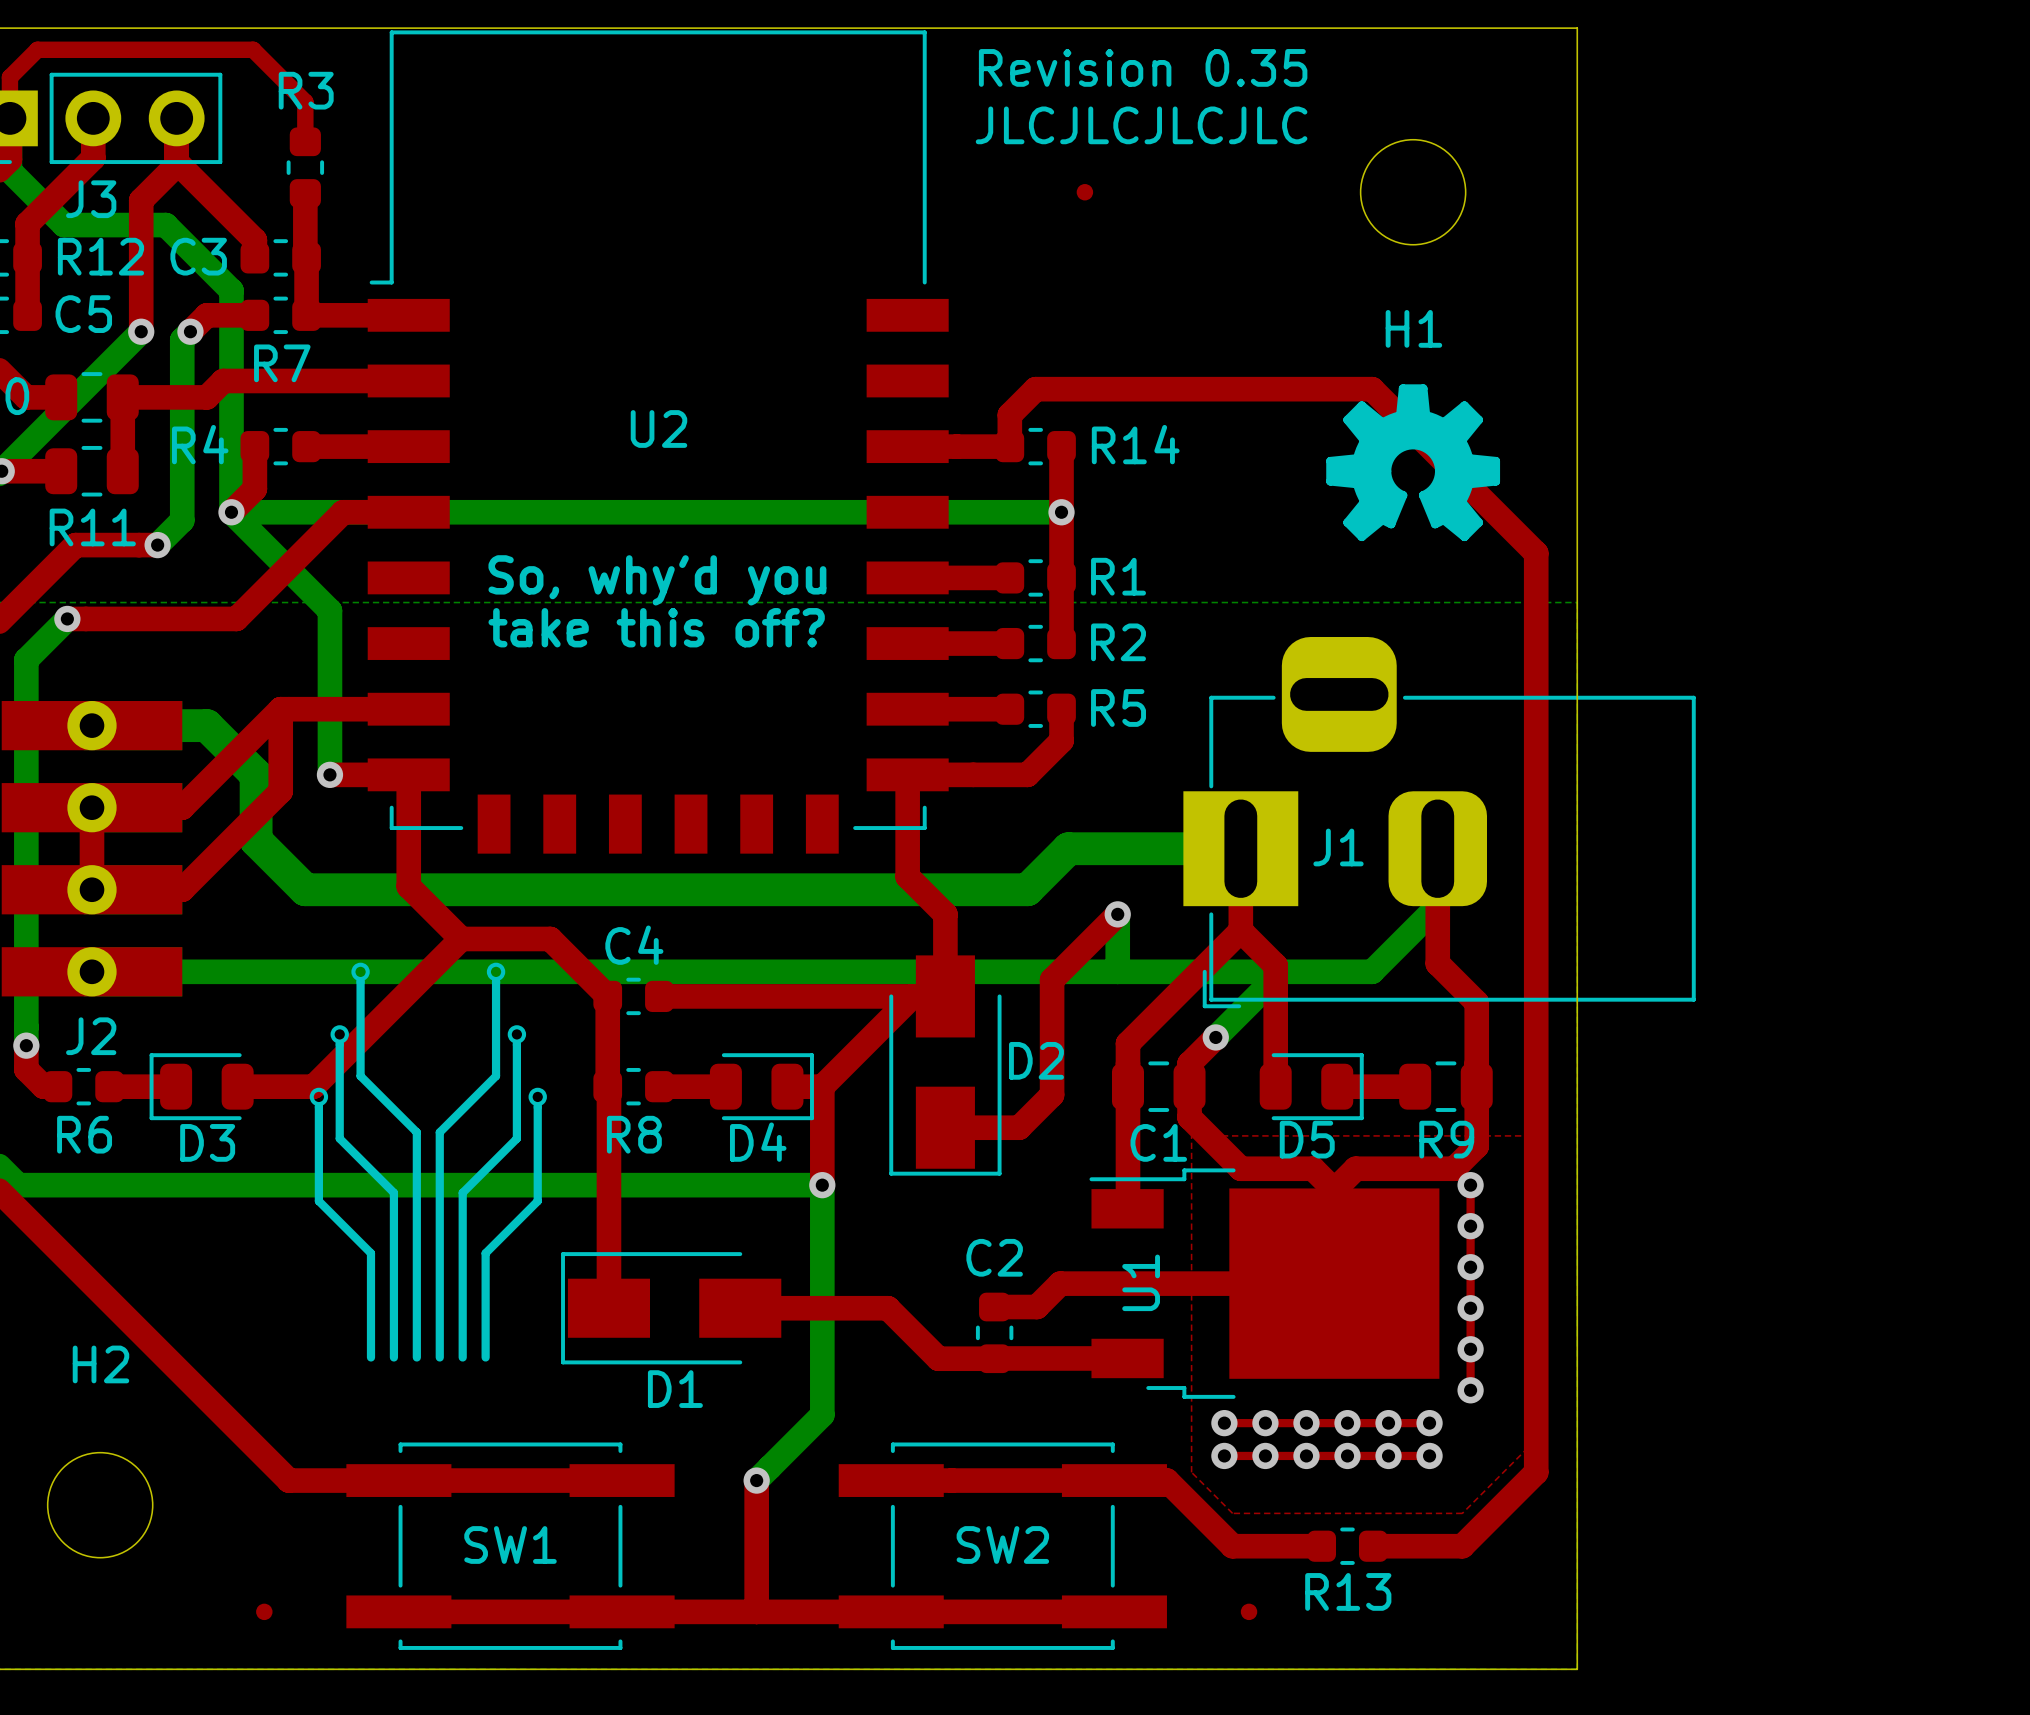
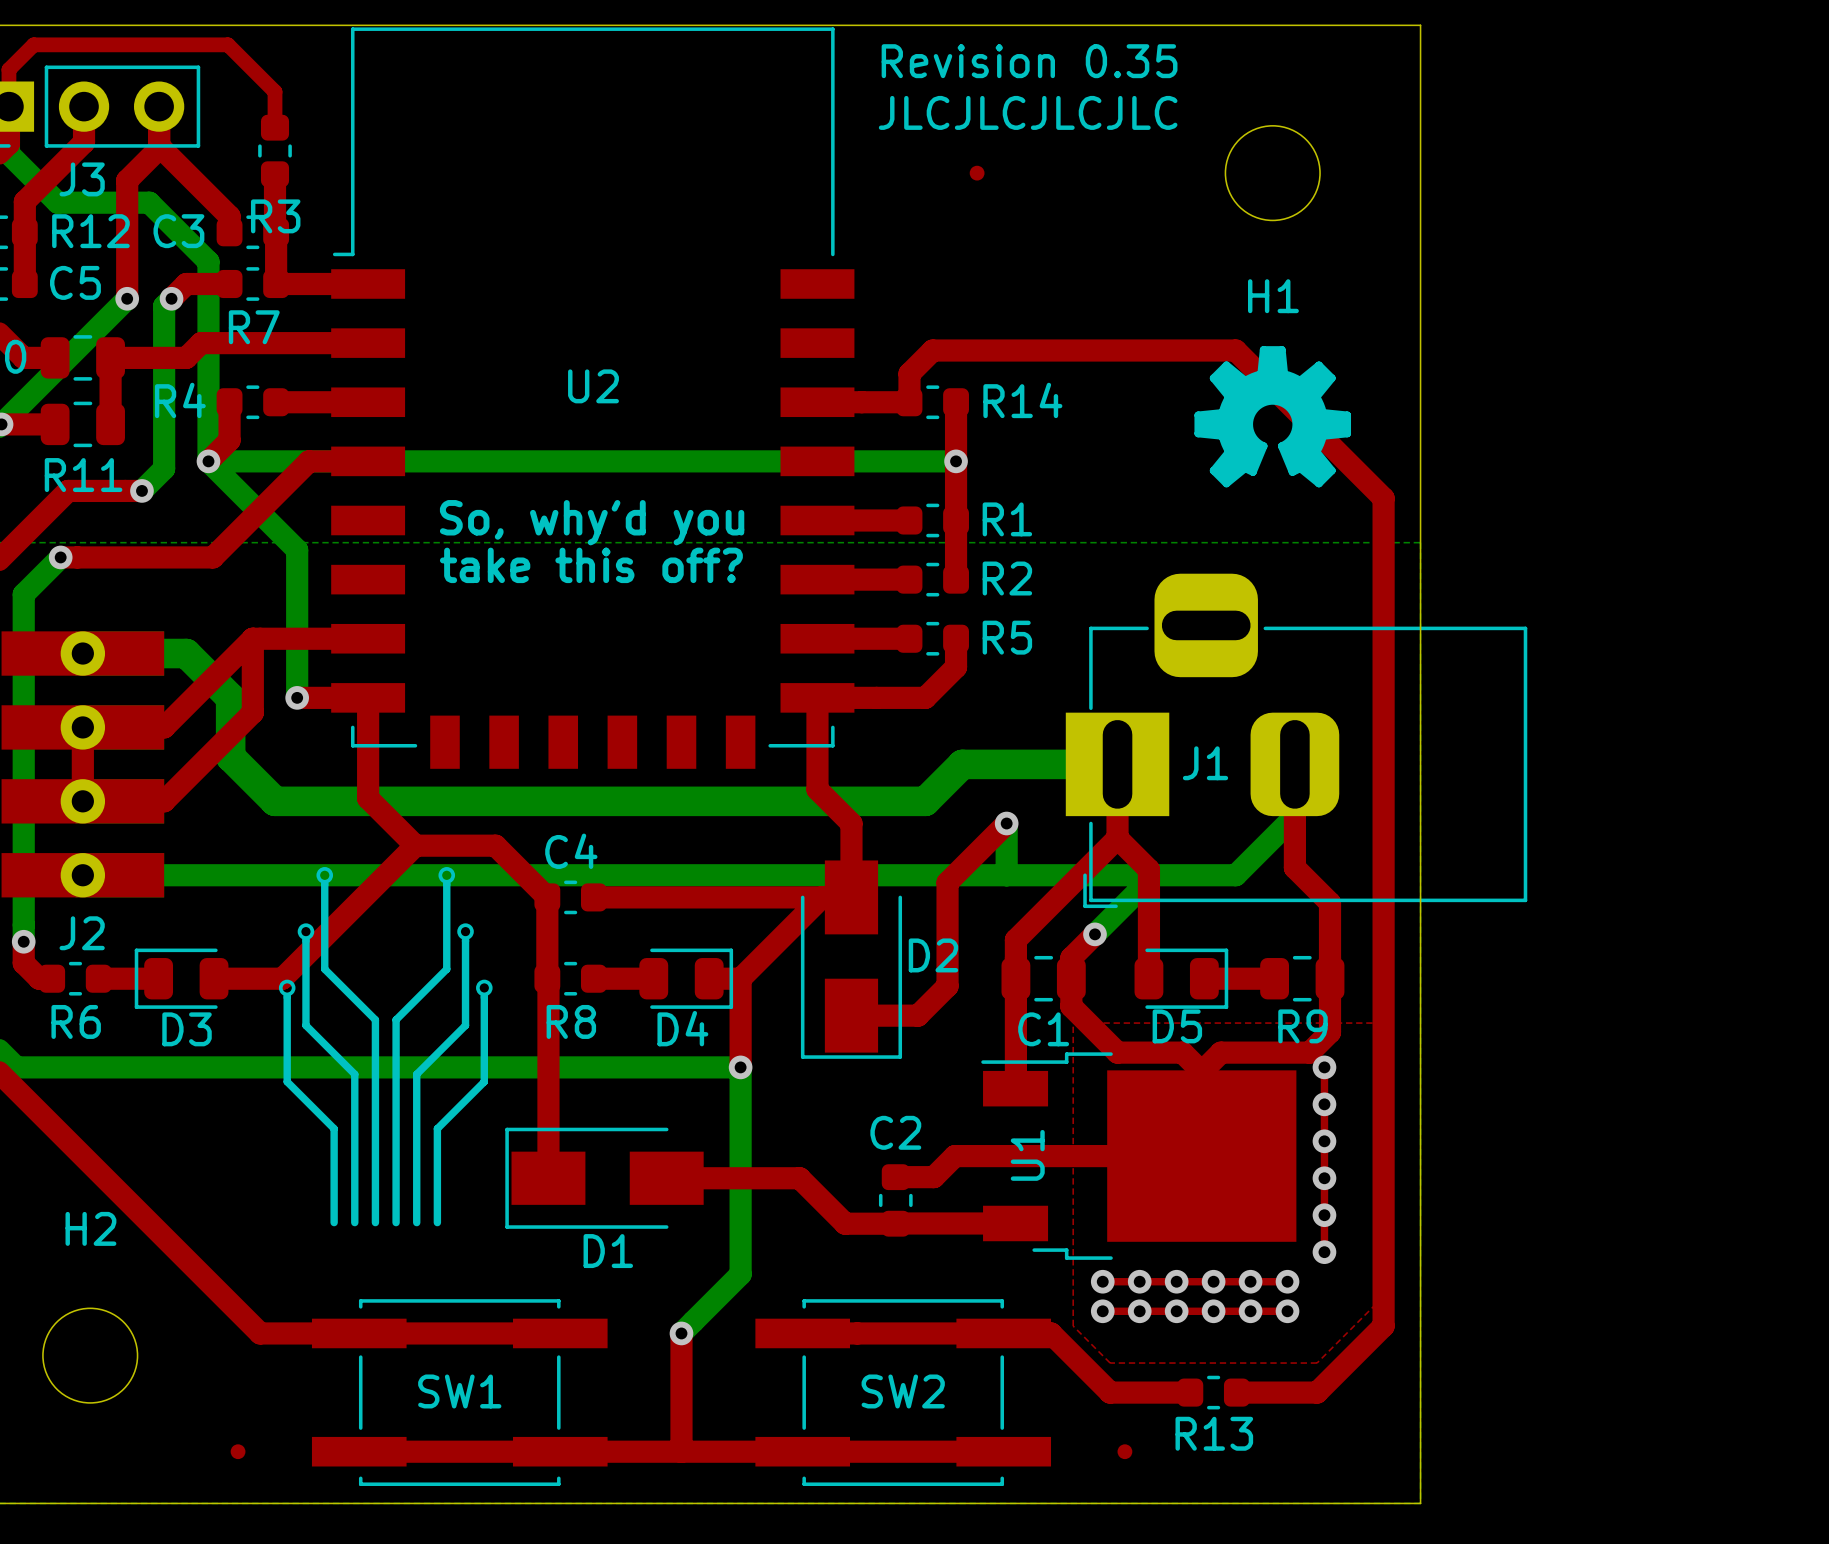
R3 name position: R3 (306, 90) -> R3 (275, 216)

